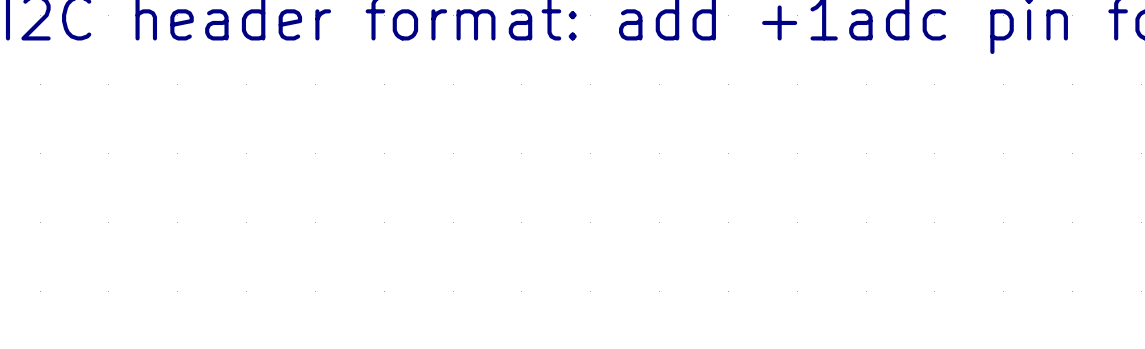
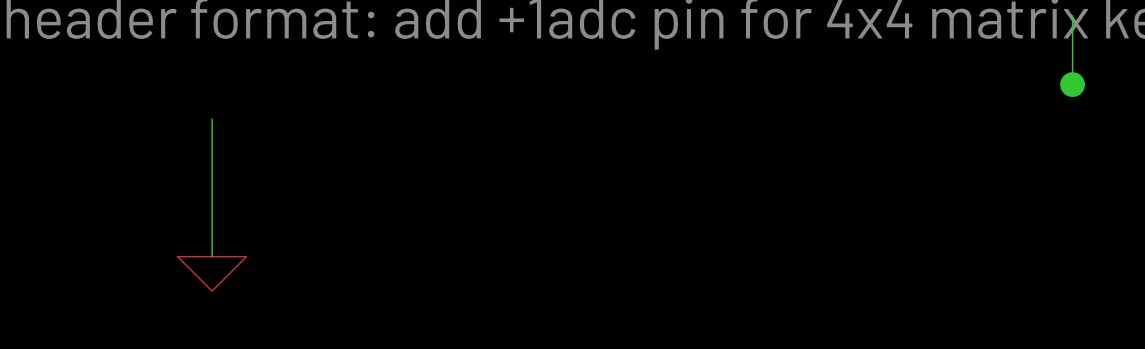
wire: none -> (1072, 15) (1072, 84)
junction: none -> (1072, 84)
wire: none -> (212, 119) (212, 256)
power symbol: none -> (212, 273)

